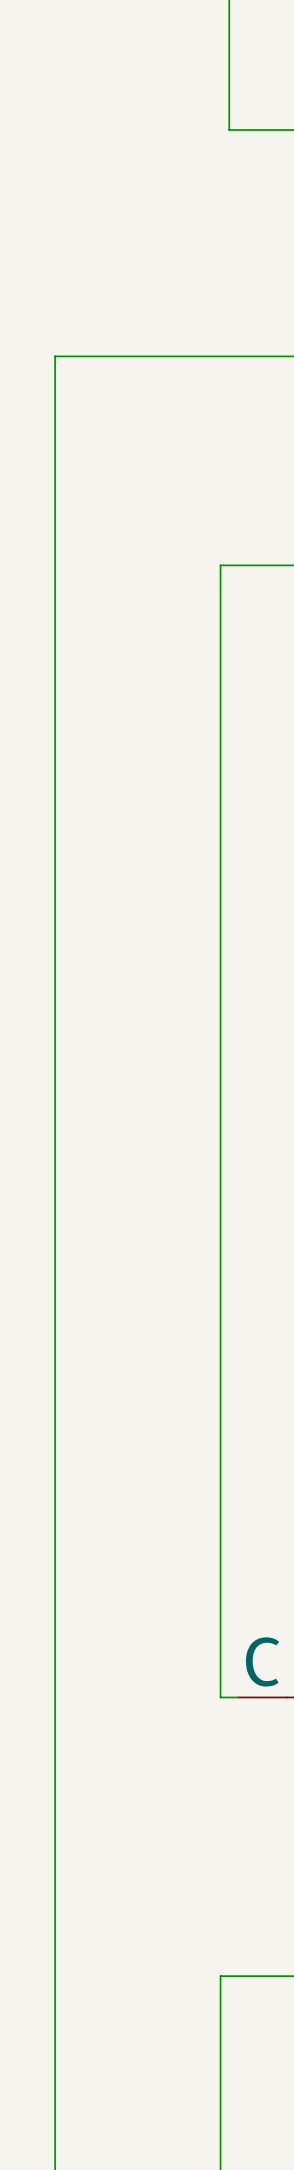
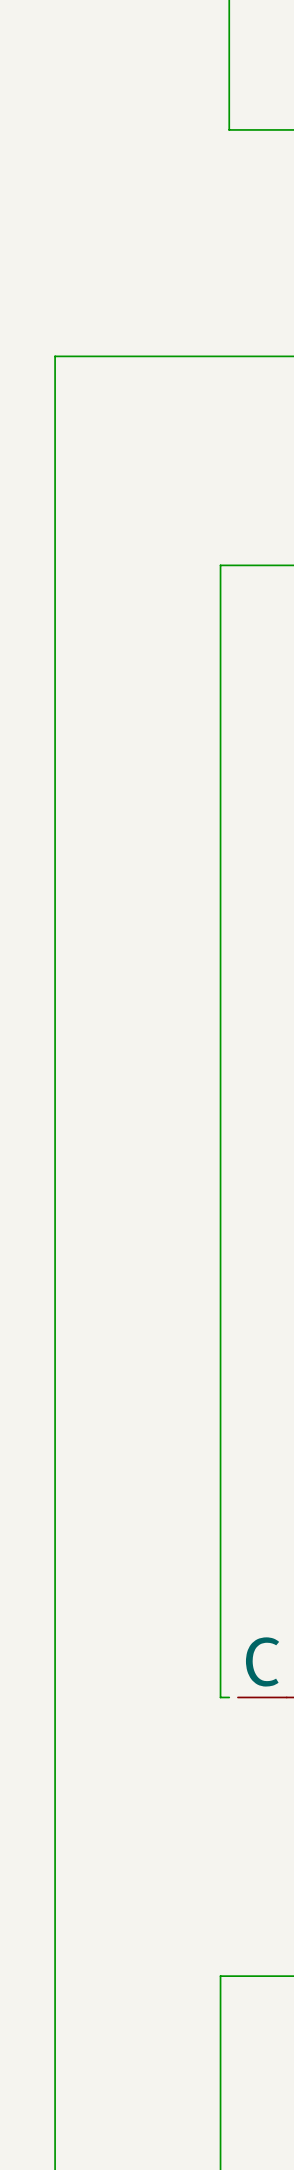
wire: (229, 1697) (237, 1697) -> none

